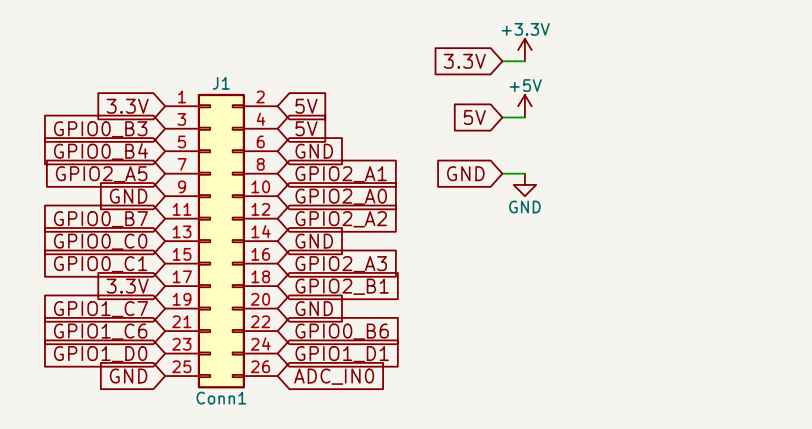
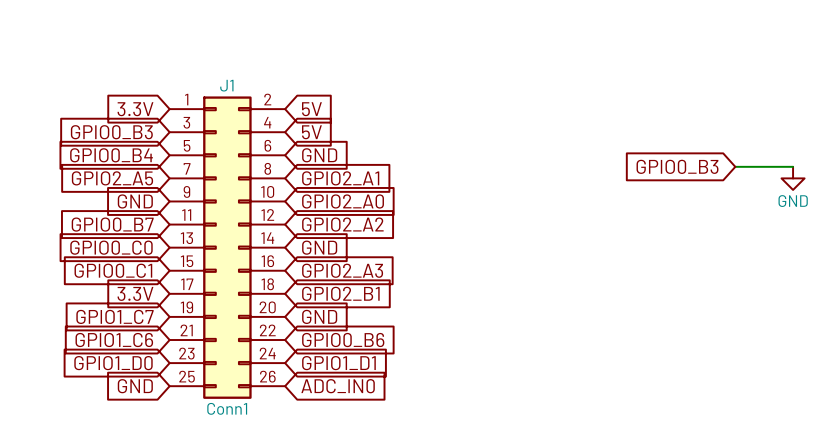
power symbol: +3.3V (524, 50) -> none
global label: 3.3V (464, 61) -> none
wire: (502, 61) (524, 61) -> none
power symbol: +5V (524, 106) -> none
global label: 5V (474, 117) -> none
wire: (502, 117) (524, 117) -> none
wire: none -> (735, 166) (793, 166)
global label: none -> GPIO0_B3 (677, 166)
global label: GND (465, 173) -> none
wire: (502, 173) (524, 173) -> none
power symbol: none -> GND (793, 178)
power symbol: GND (524, 184) -> none

